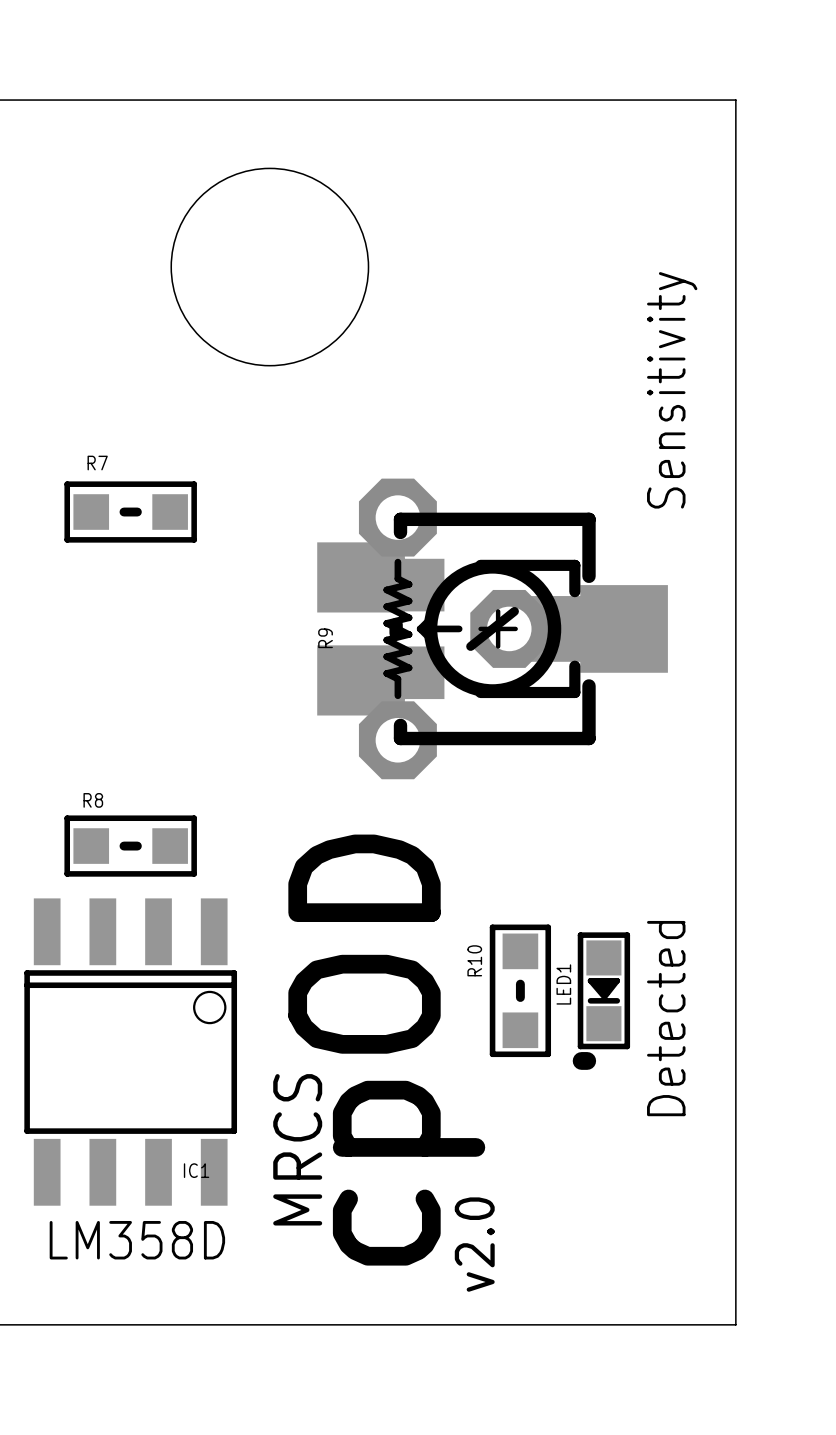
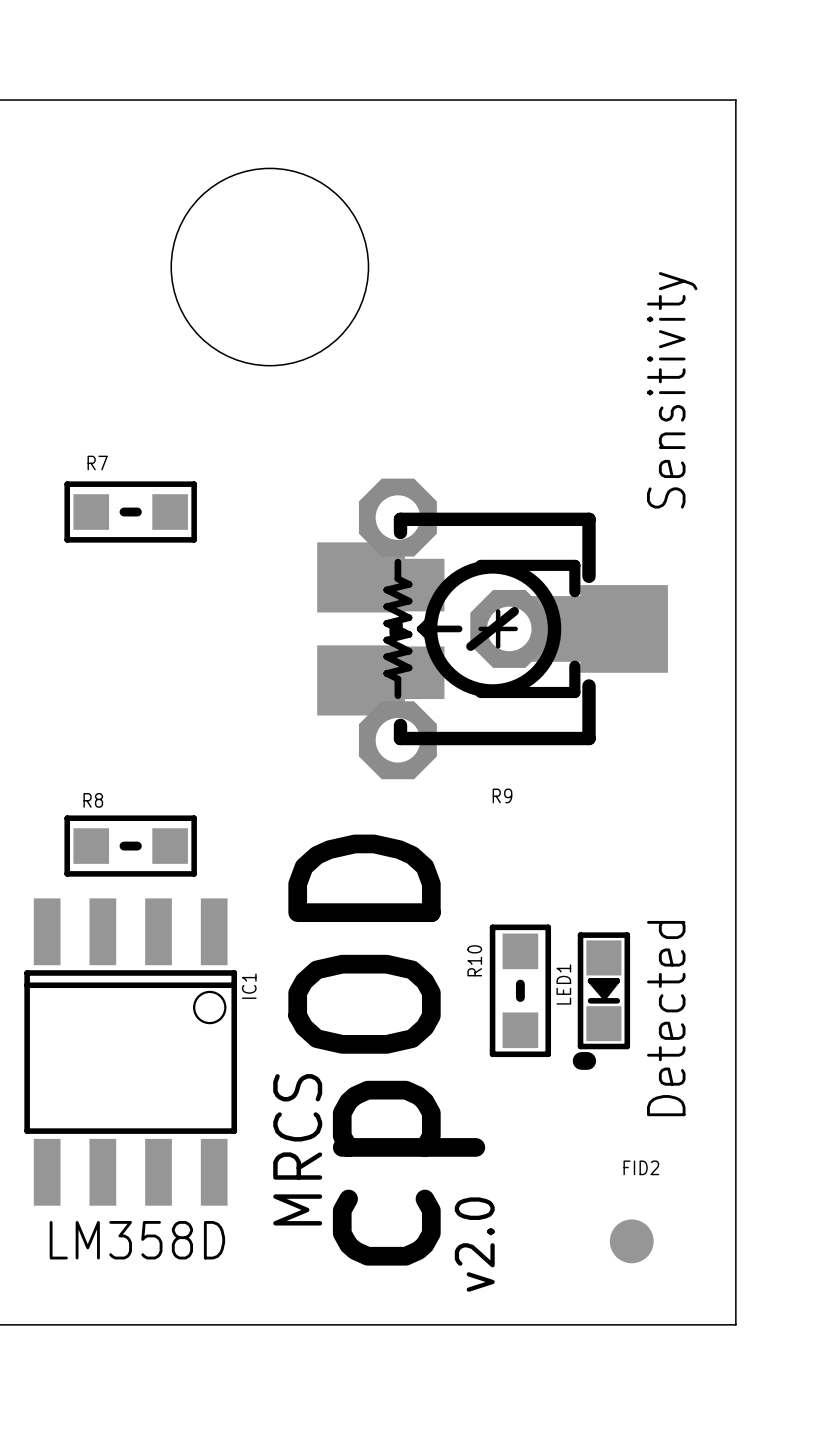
R9 name rotation: 0° (325, 638) -> 90° clockwise (502, 795)
R9 name position: R9 (325, 638) -> R9 (502, 795)
IC1 name rotation: 0° (196, 1170) -> 90° counterclockwise (249, 986)
IC1 name position: IC1 (196, 1170) -> IC1 (249, 986)
FID2: none -> (631, 1241)

